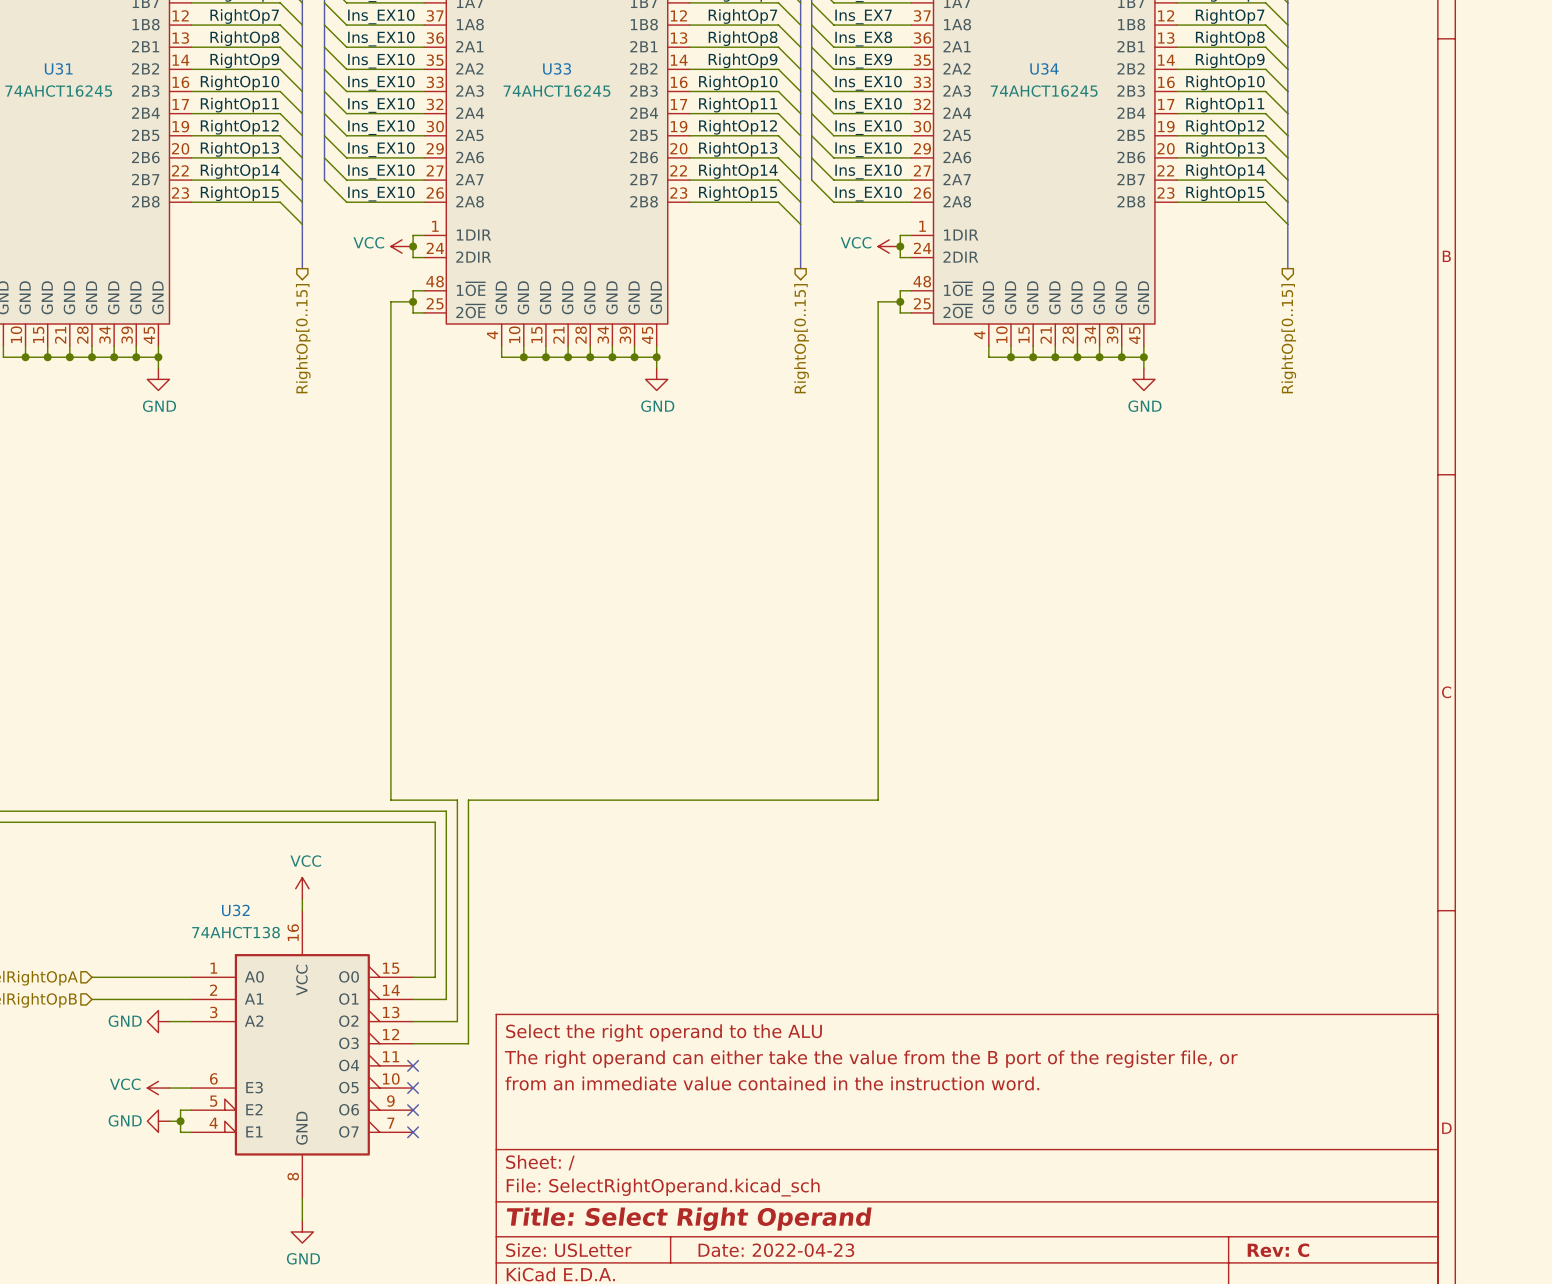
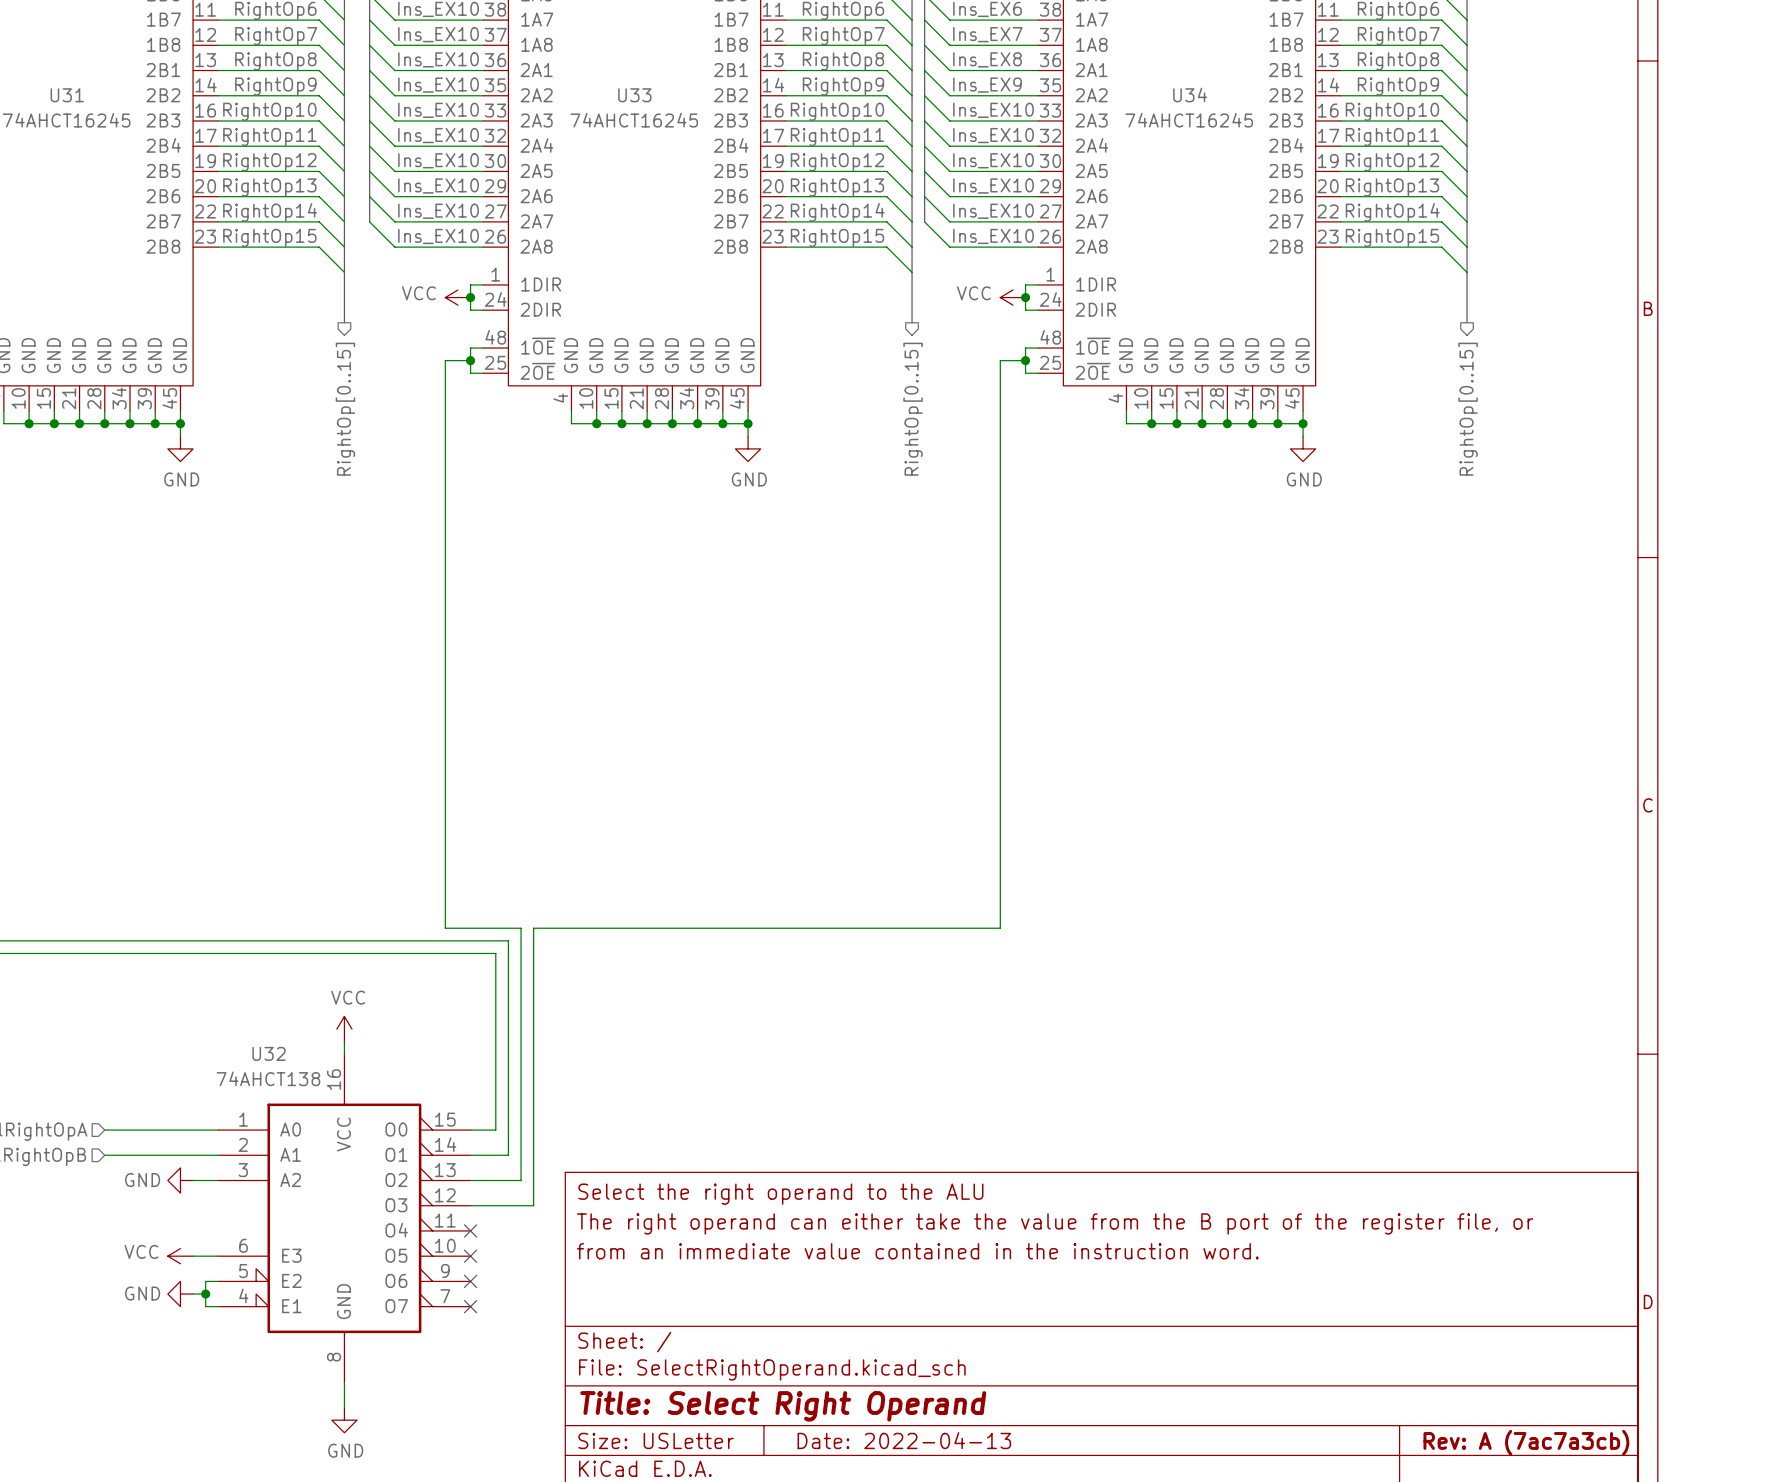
title block: Date: 2022-04-23 (776, 1250) -> Date: 2022-04-13 (904, 1440)
title block: Rev: C (1278, 1250) -> Rev: A (7ac7a3cb) (1526, 1442)

